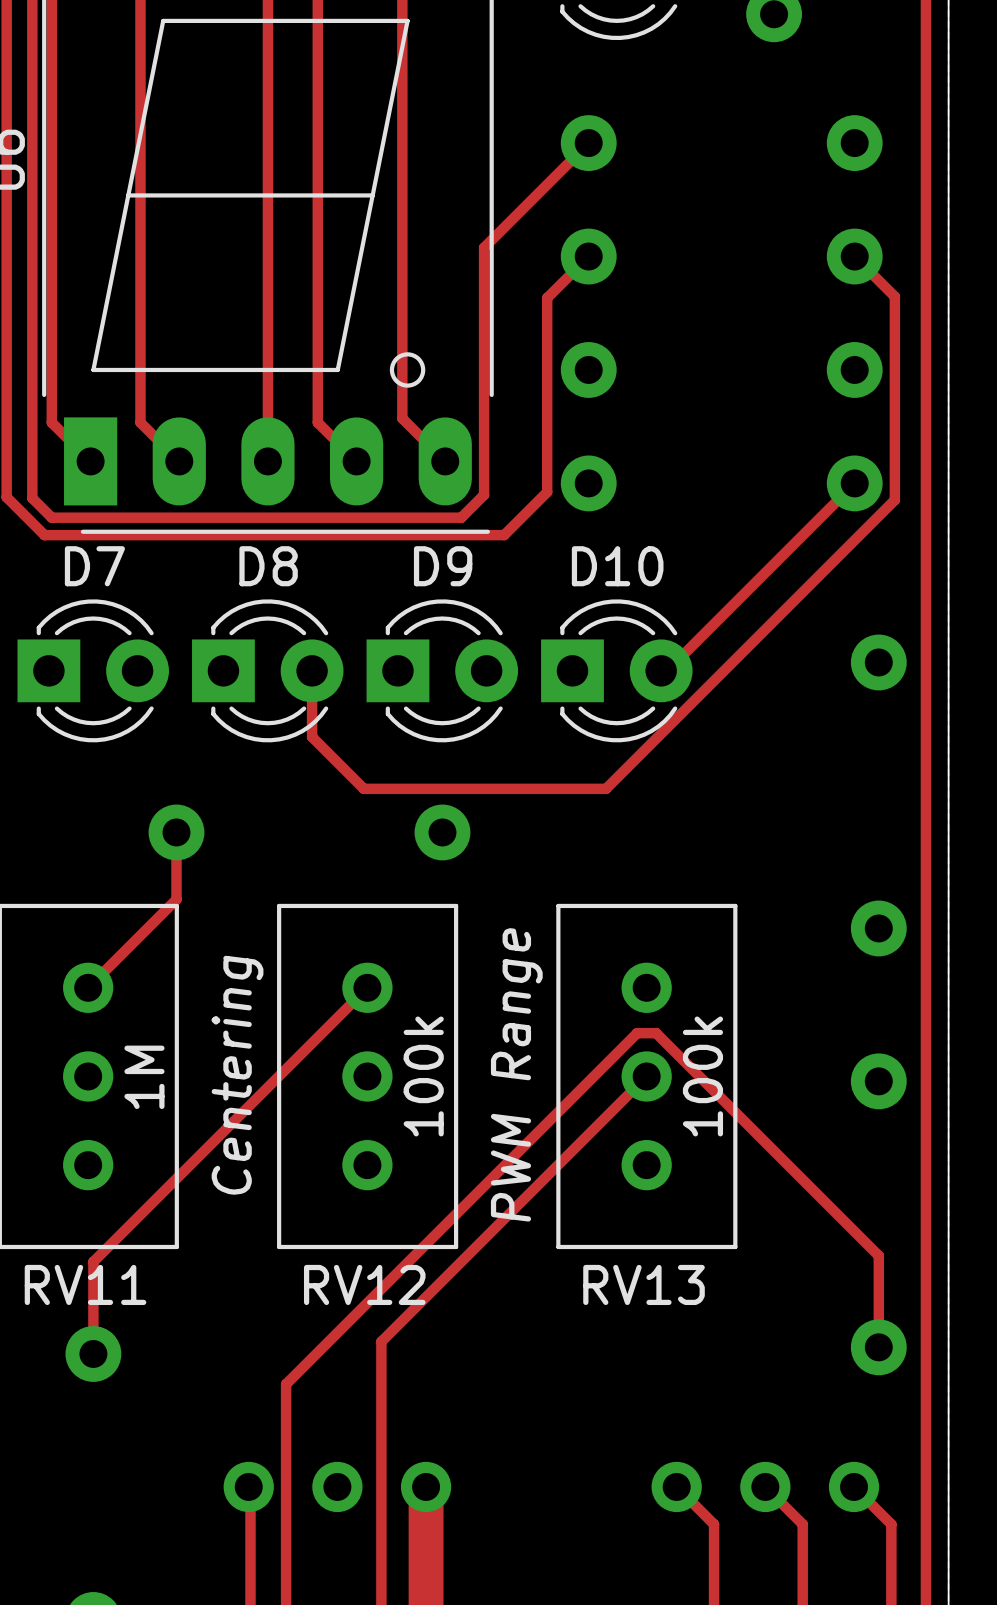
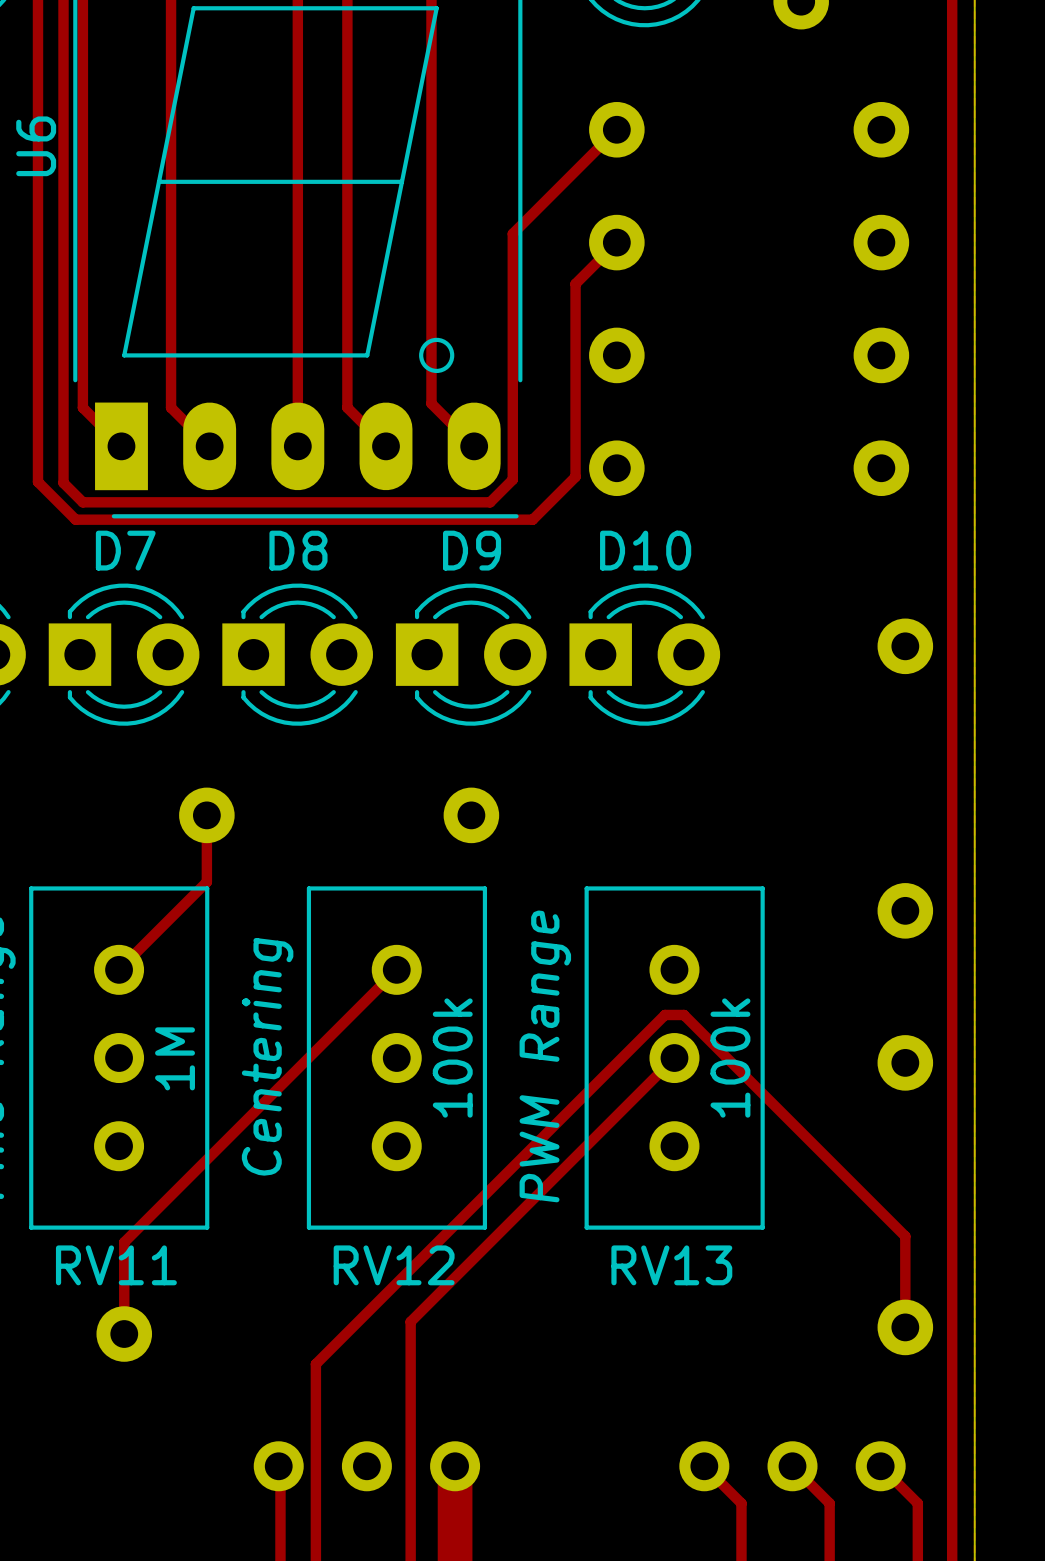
track: (854, 256) (894, 296) (894, 500) (606, 788) (363, 788) (312, 737) (312, 670) -> none
track: (854, 483) (667, 670) (661, 670) -> none

